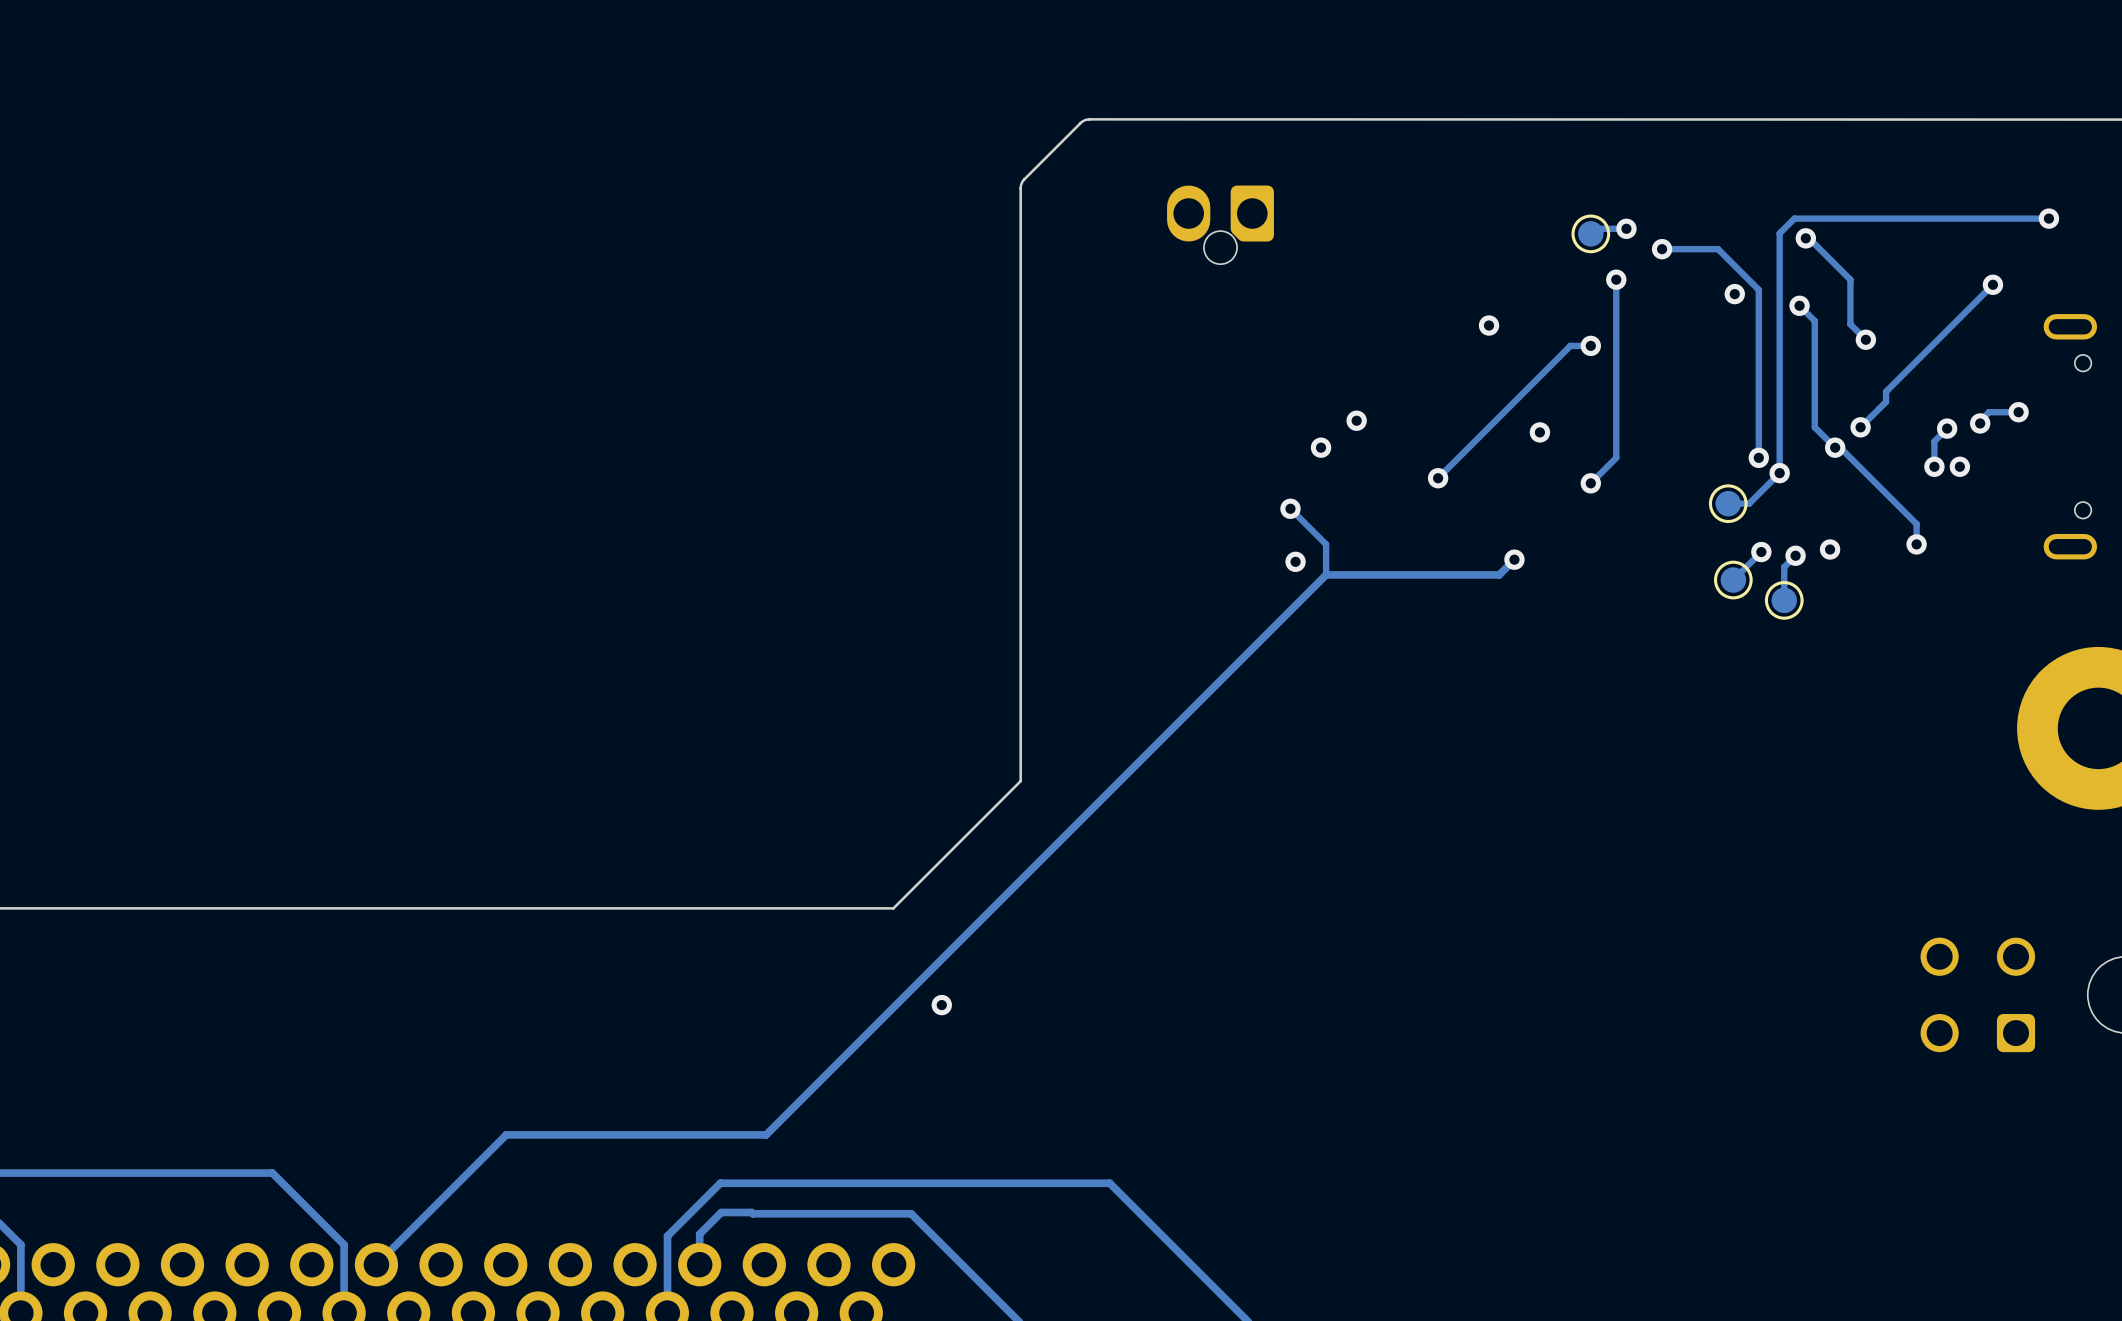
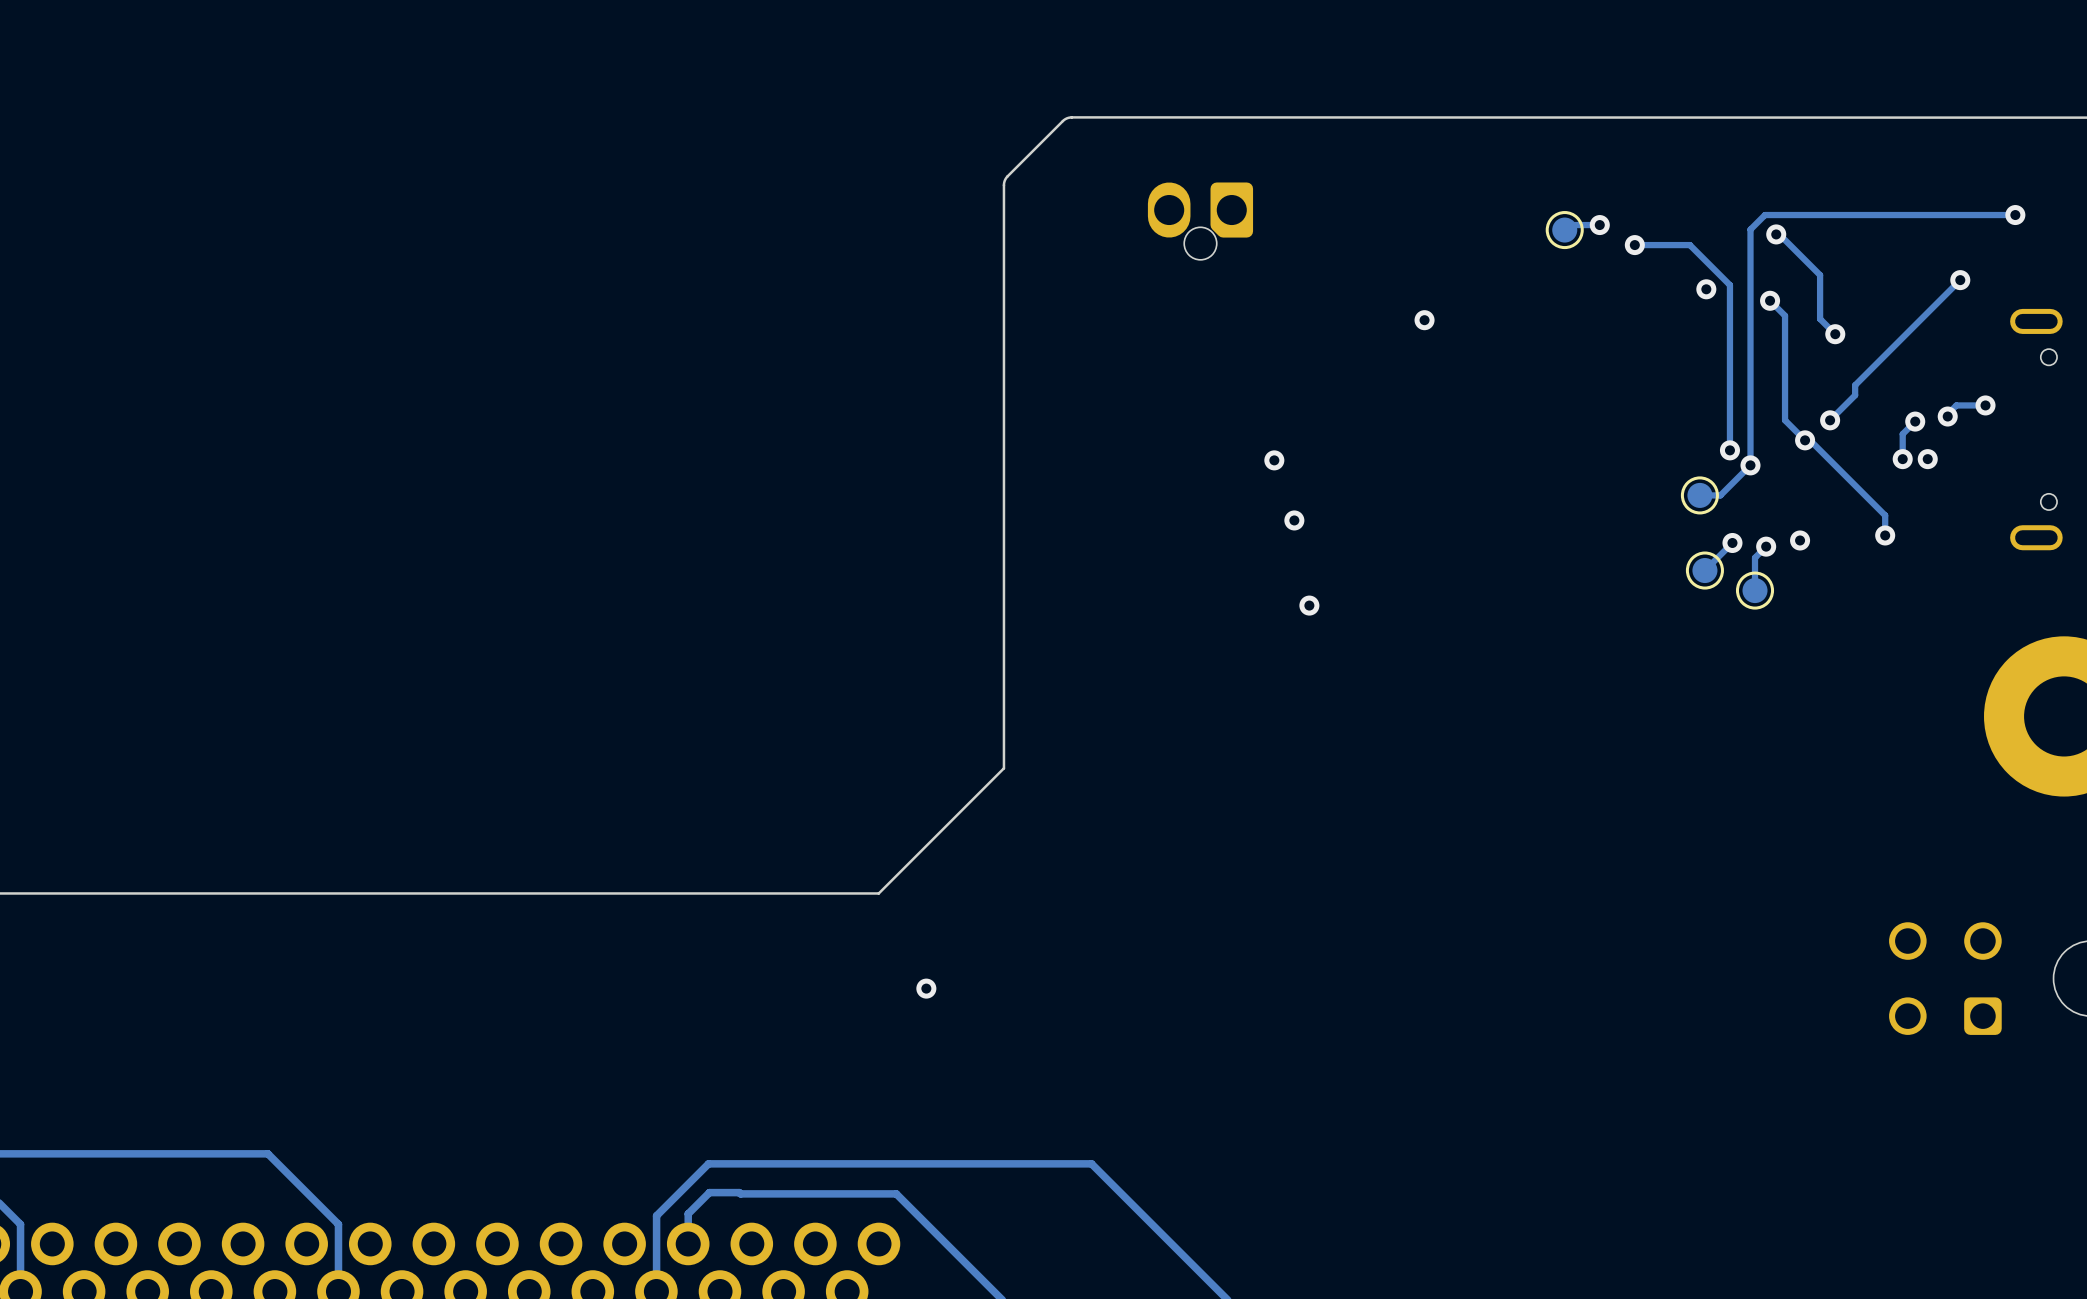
track: (1616, 279) (1616, 457) (1590, 483) -> none
via: (1616, 279) -> none
via position: (1489, 325) -> (1424, 320)
track: (1590, 345) (1570, 345) (1438, 478) -> none
via: (1590, 345) -> none
via: (1356, 420) -> none
via: (1539, 432) -> none
via: (1321, 447) -> none
via: none -> (1274, 460)
via: (1438, 478) -> none
via: (1590, 483) -> none
track: (1290, 508) (1326, 544) (1326, 574) -> none
via: (1290, 508) -> none
via: none -> (1294, 520)
track: (1514, 559) (1499, 574) (1326, 574) -> none
via: (1514, 559) -> none
via: (1295, 561) -> none
track: (1326, 574) (766, 1134) (506, 1134) (376, 1264) -> none
via: none -> (1309, 605)

